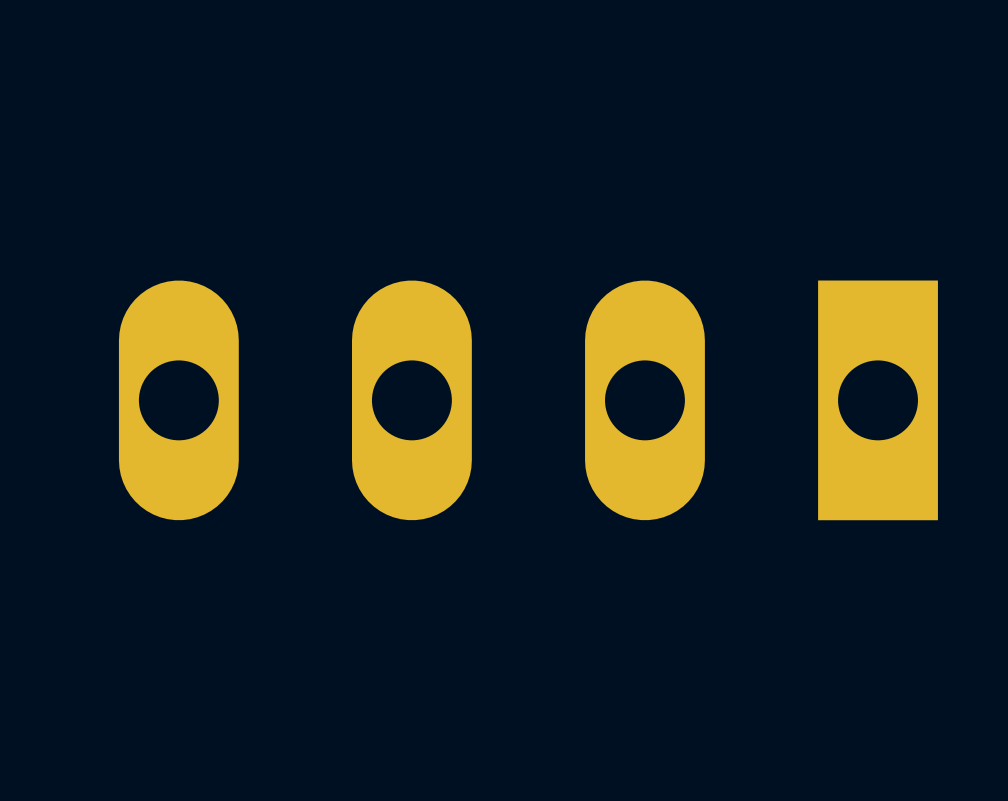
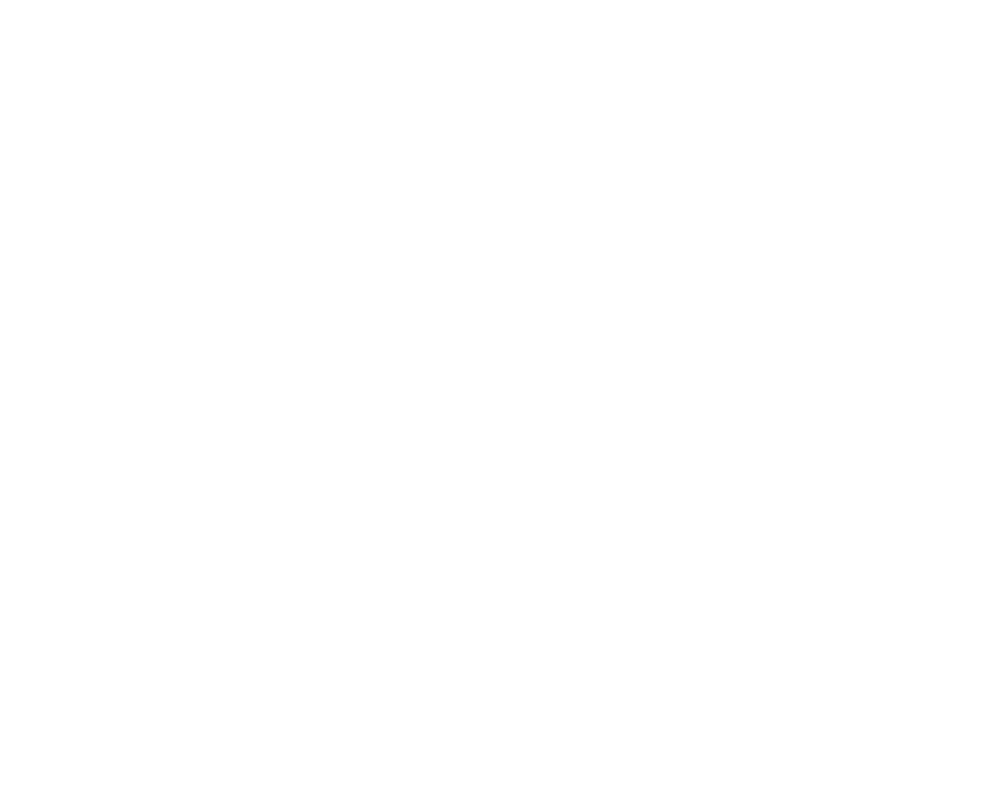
part: (528, 400) -> none

